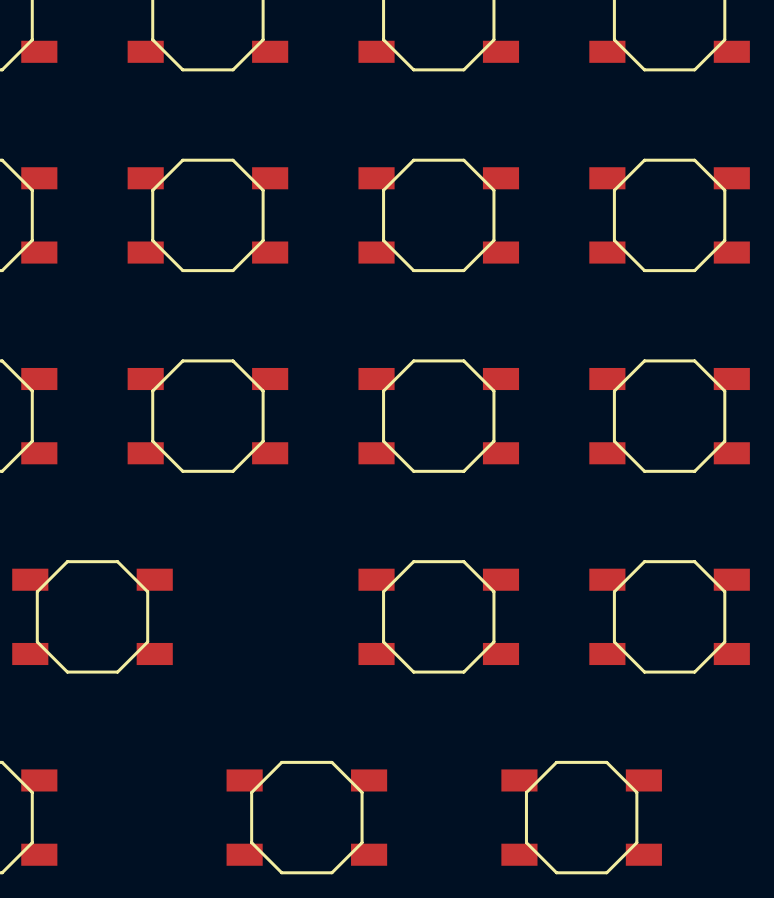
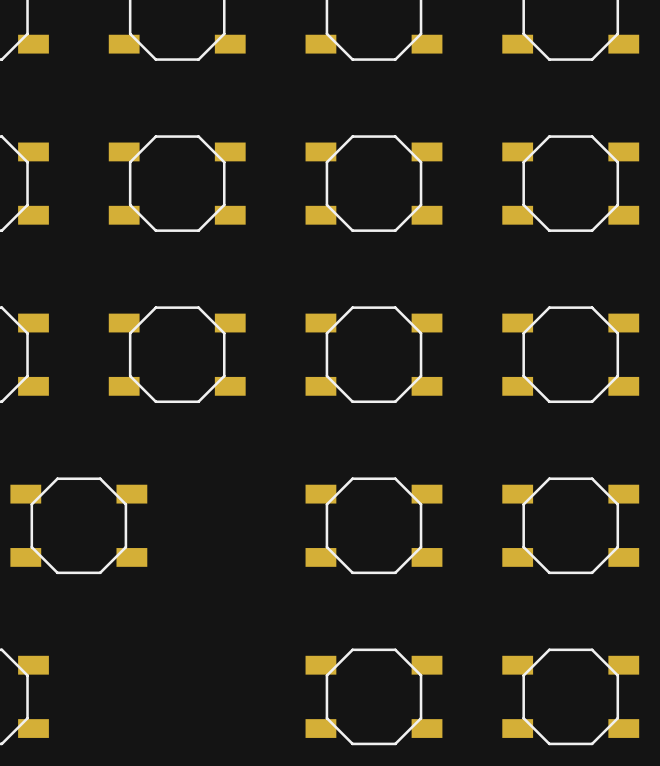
part: (306, 817) -> none
part: none -> (373, 696)
part: (581, 817) -> none
part: none -> (570, 696)

